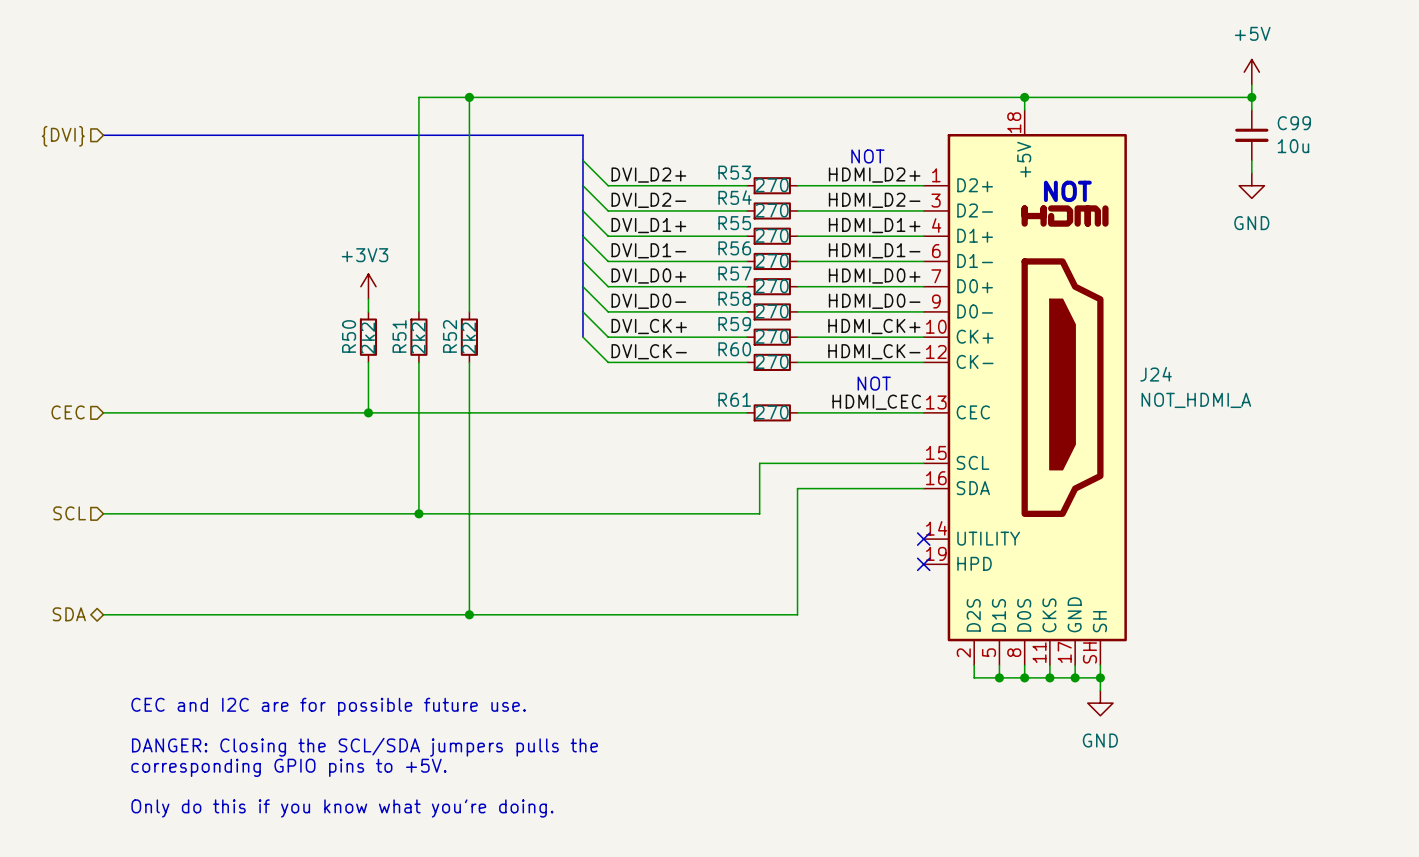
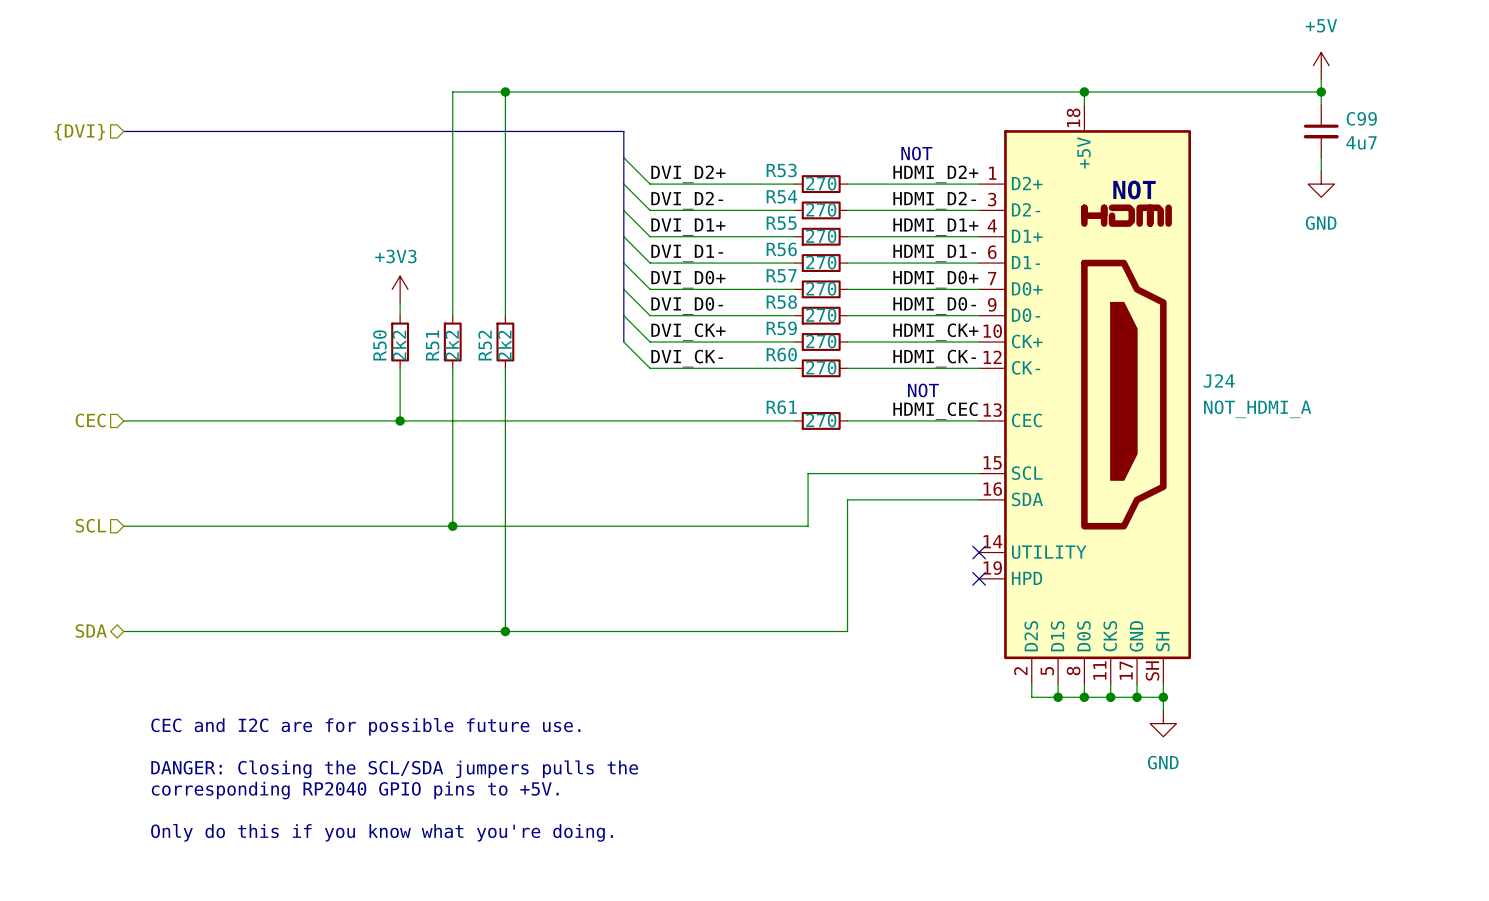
C99 value: 10u (1293, 146) -> 4u7 (1361, 142)
text: corresponding GPIO pins to +5V. (288, 767) -> corresponding RP2040 GPIO pins to +5V. (355, 790)

